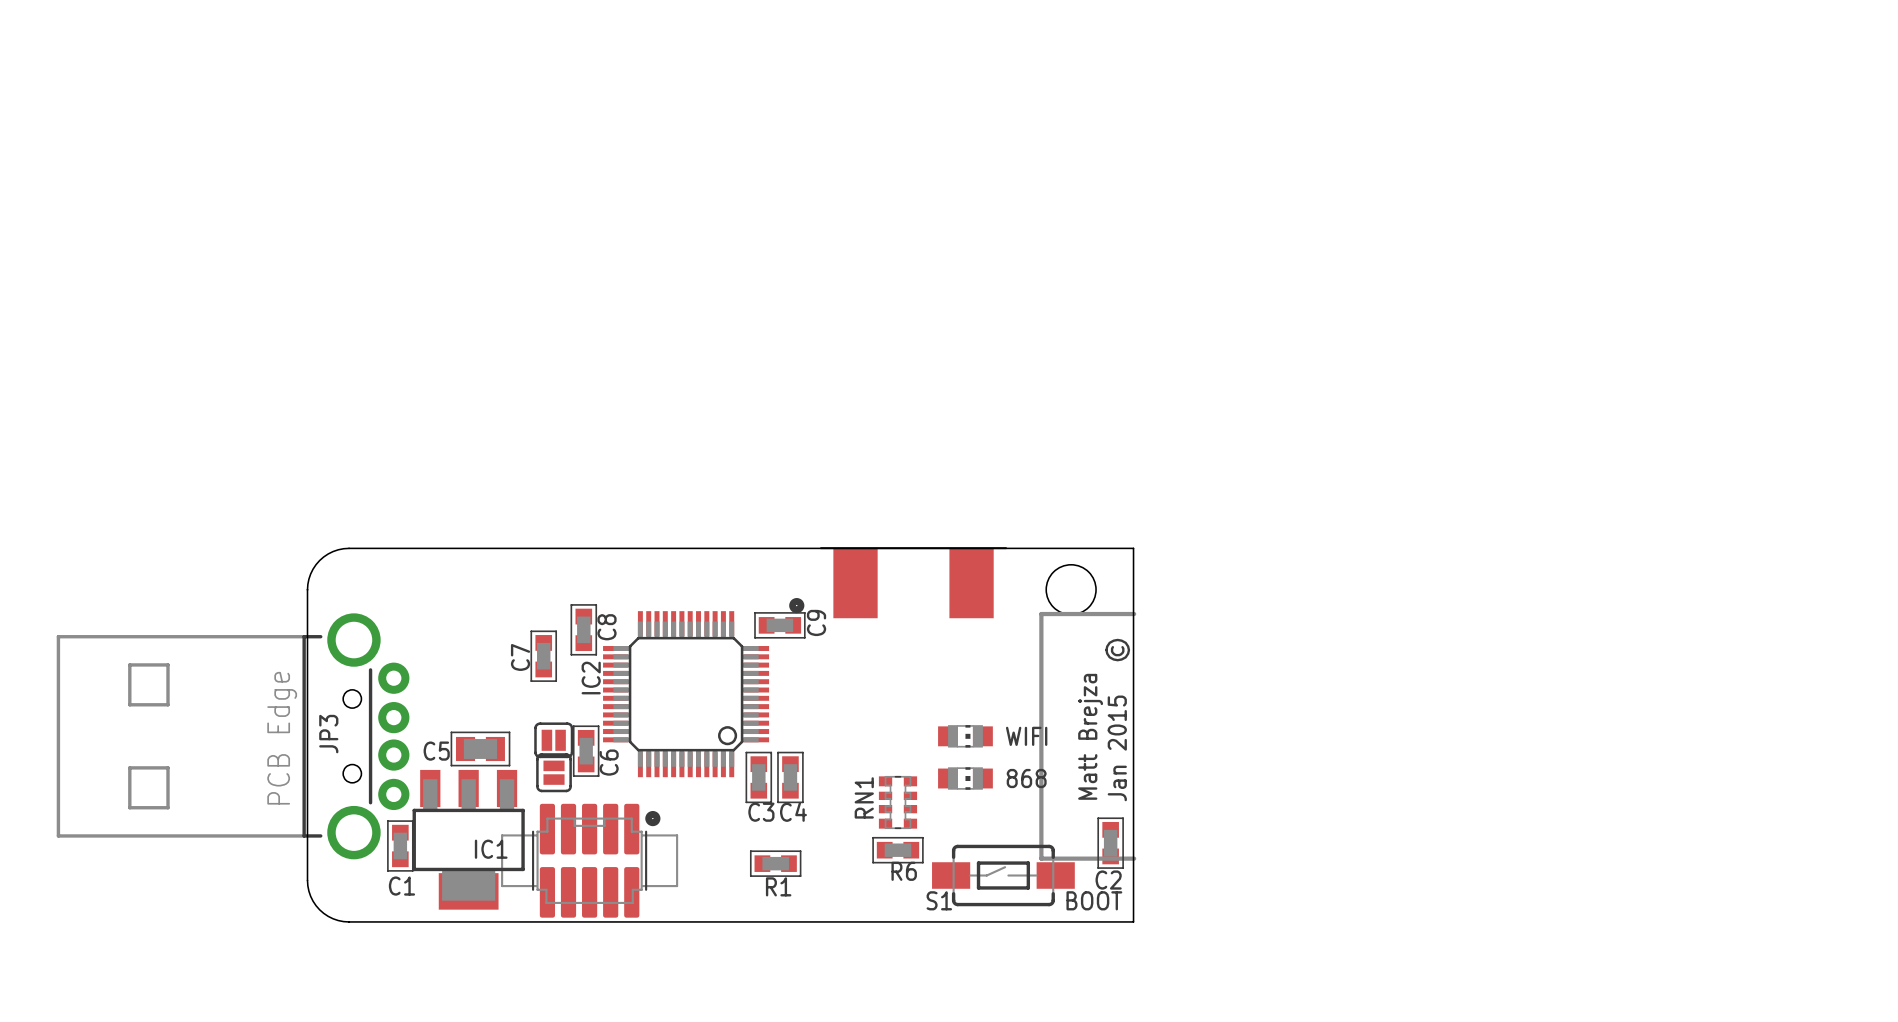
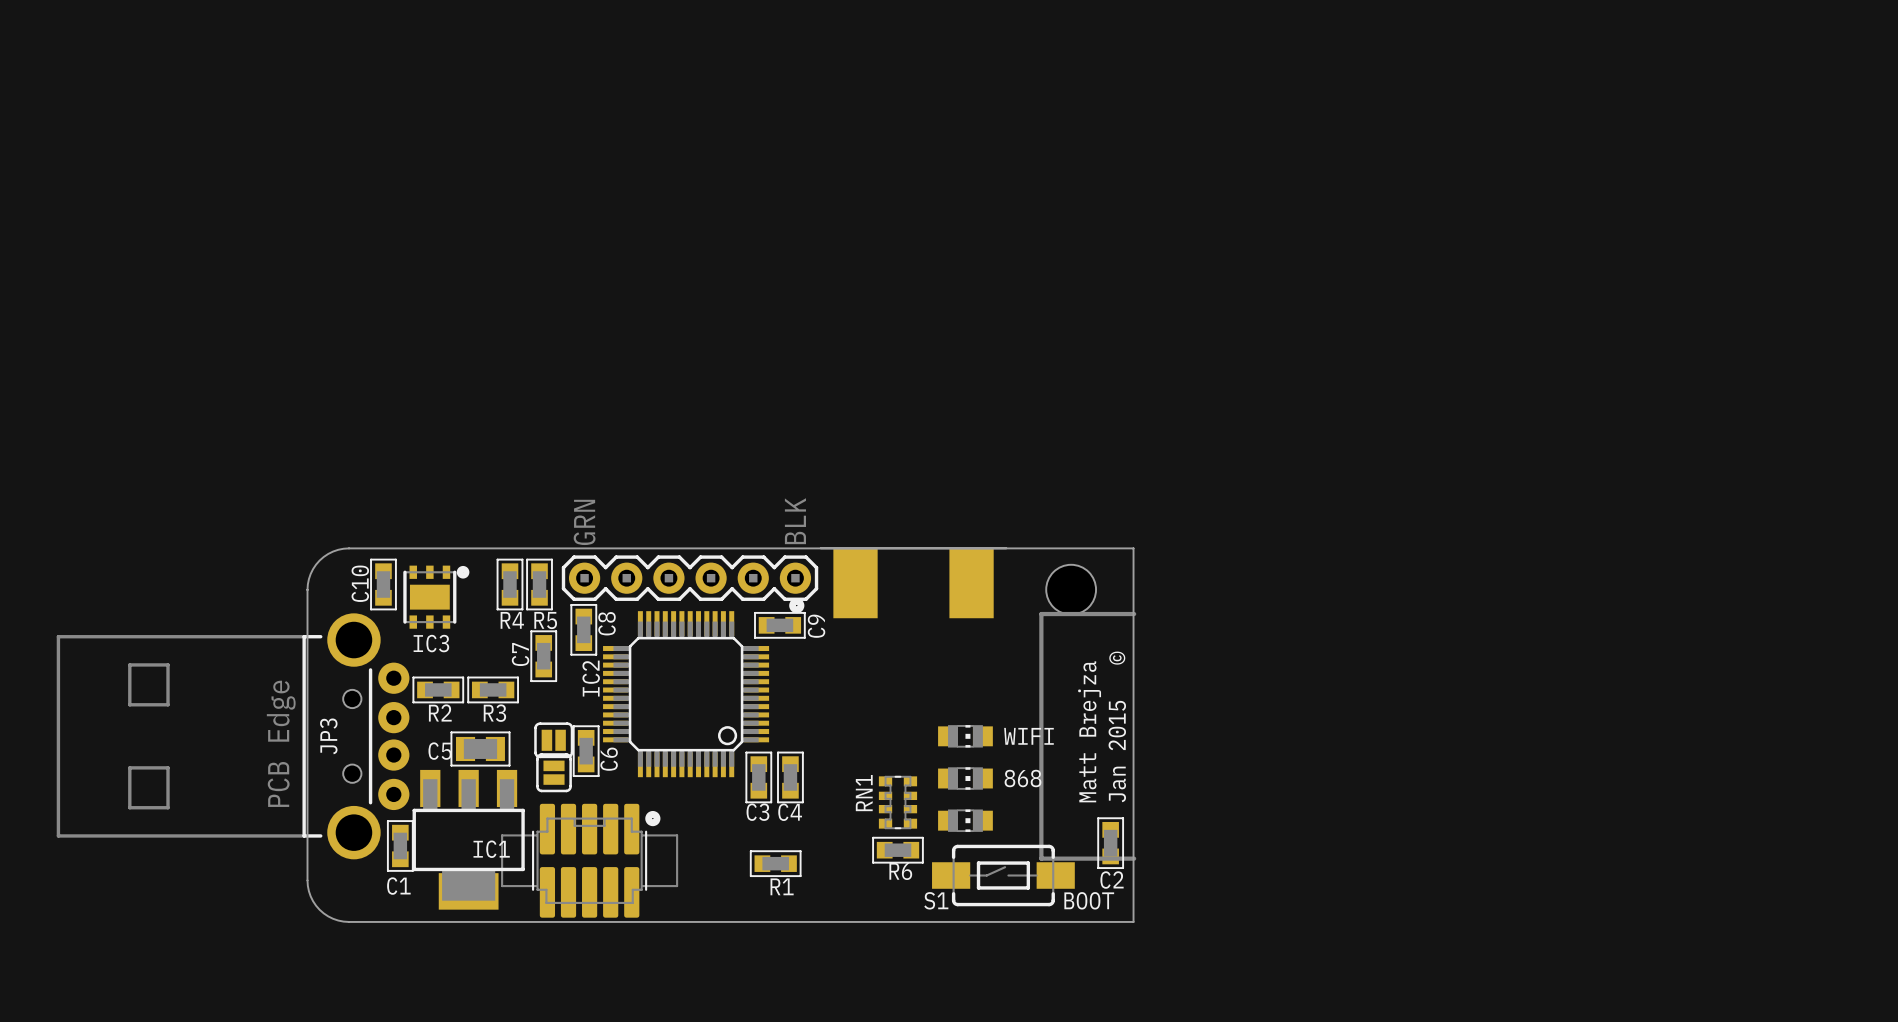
part: none -> (690, 578)
C10: none -> (383, 584)
R4: none -> (510, 584)
R5: none -> (539, 584)
part: none -> (436, 597)
text: none -> IC3 (431, 643)
R2: none -> (438, 689)
R3: none -> (493, 689)
part: none -> (965, 820)

